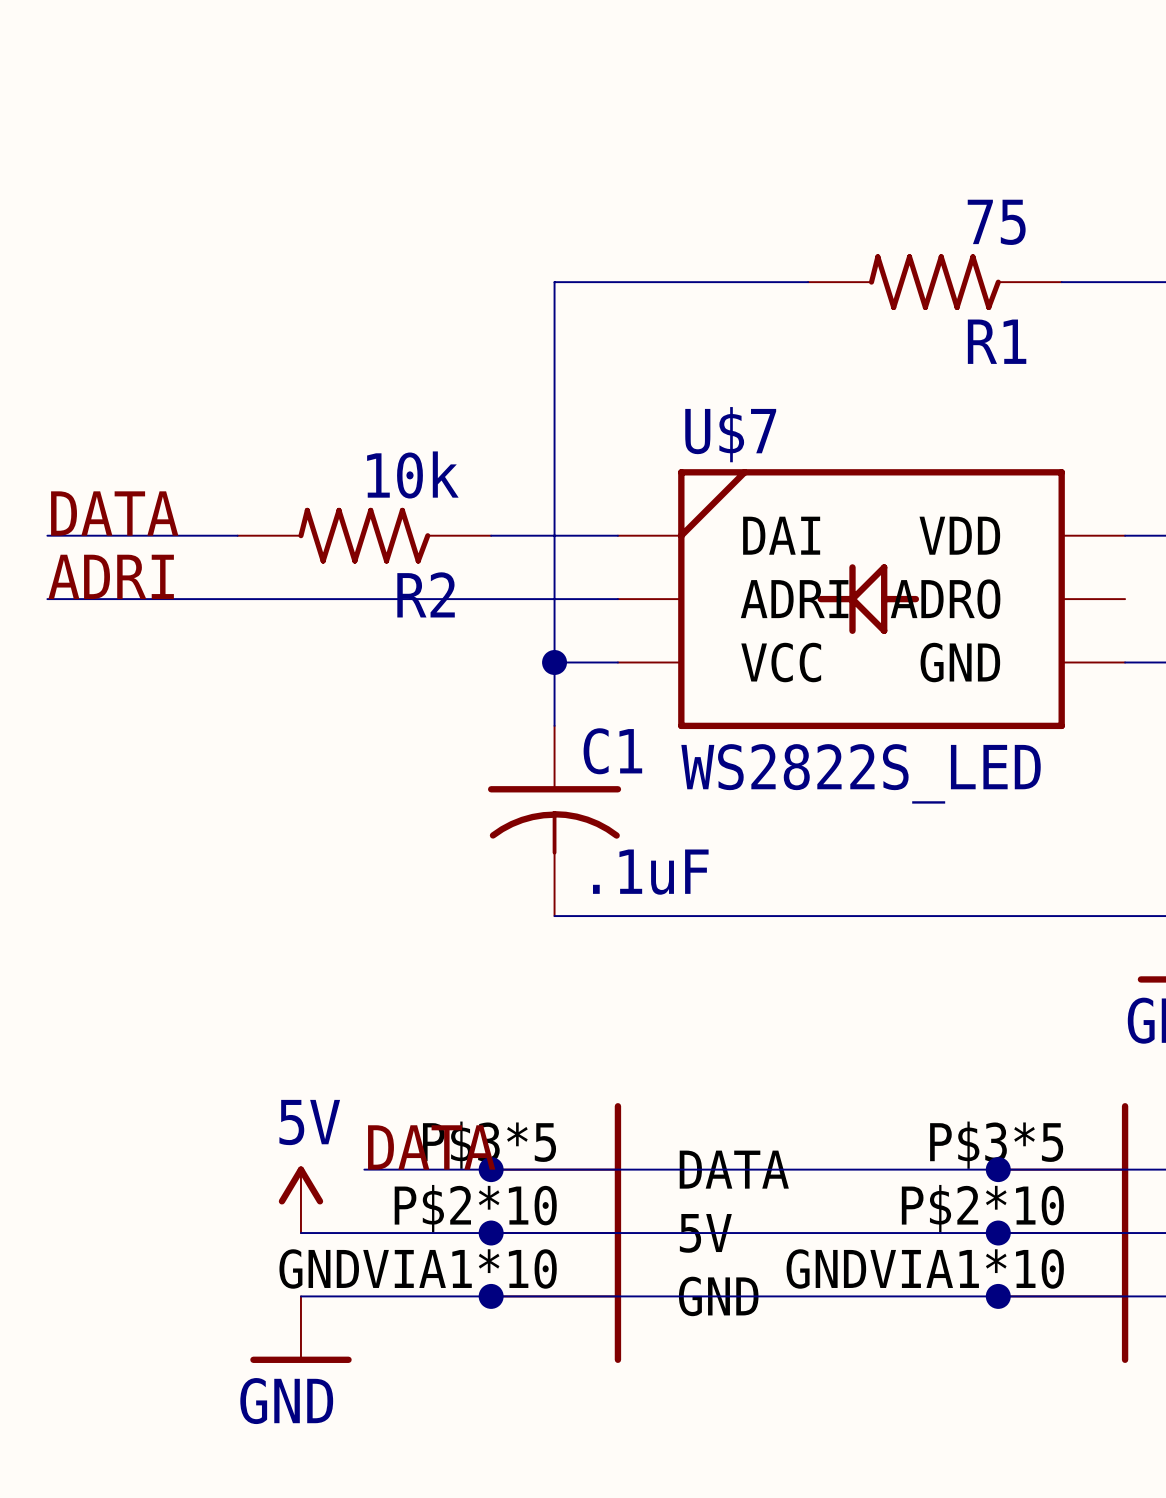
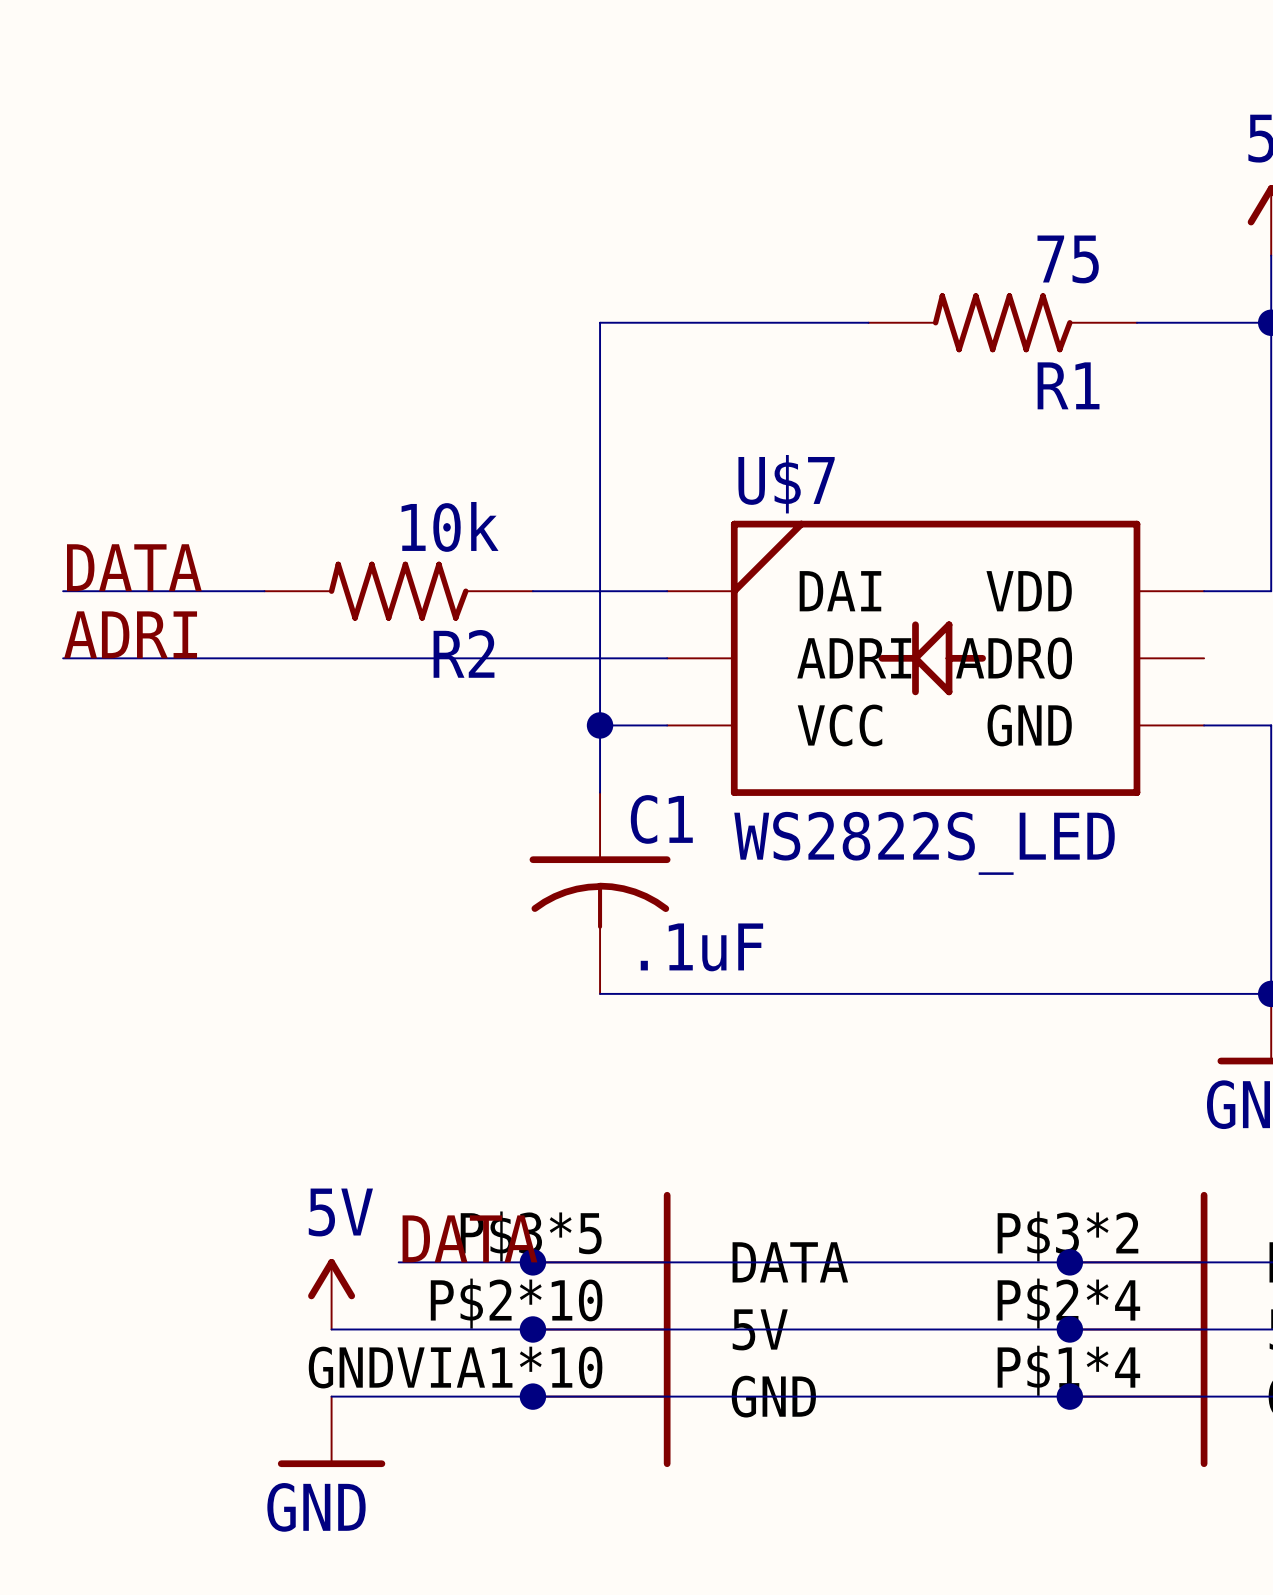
part pin number: P$3*5 (996, 1145) -> P$3*2 (1067, 1236)
part pin number: P$2*10 (982, 1208) -> P$2*4 (1068, 1303)
part pin number: GNDVIA1*10 (925, 1268) -> P$1*4 (1068, 1370)

